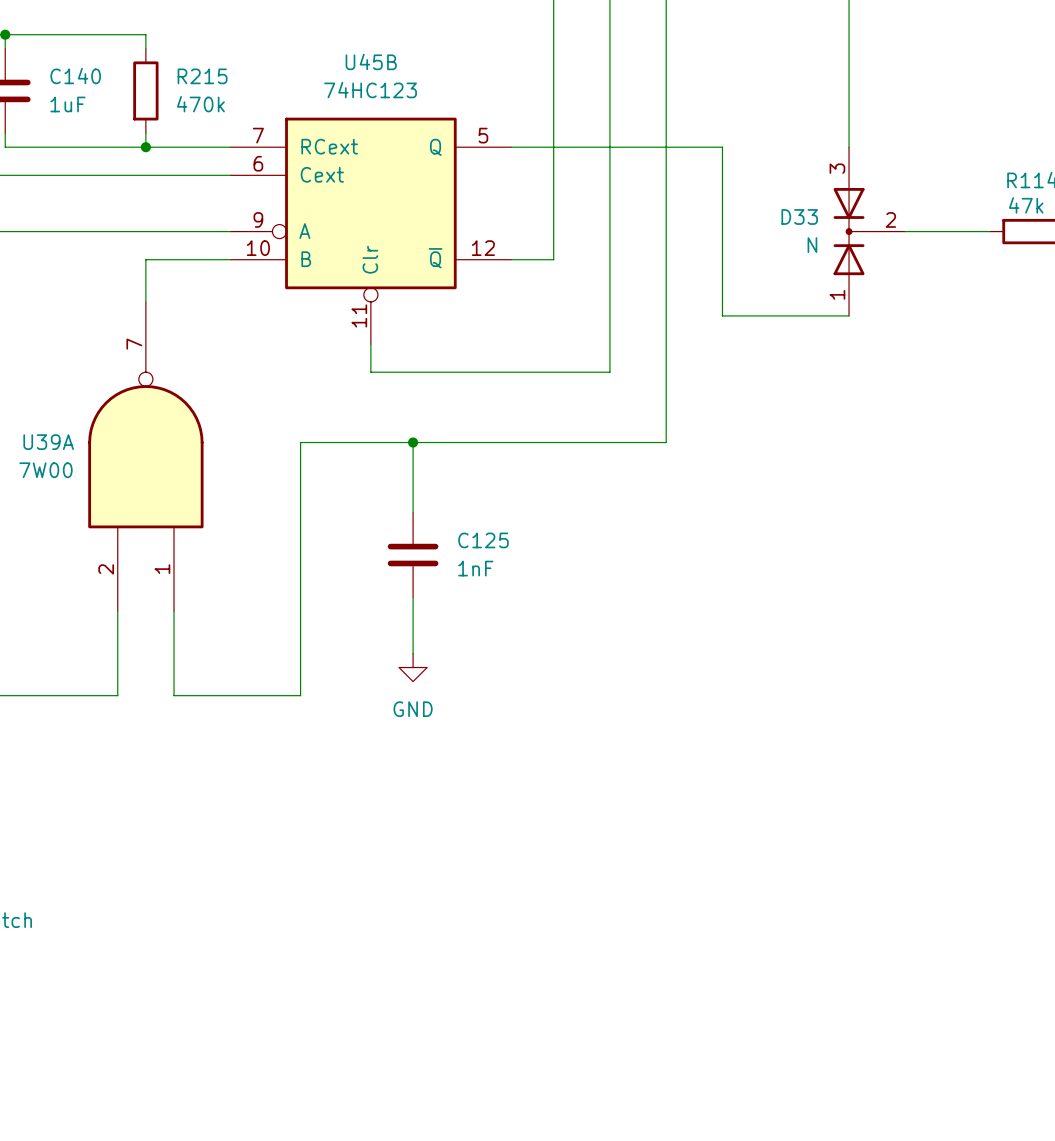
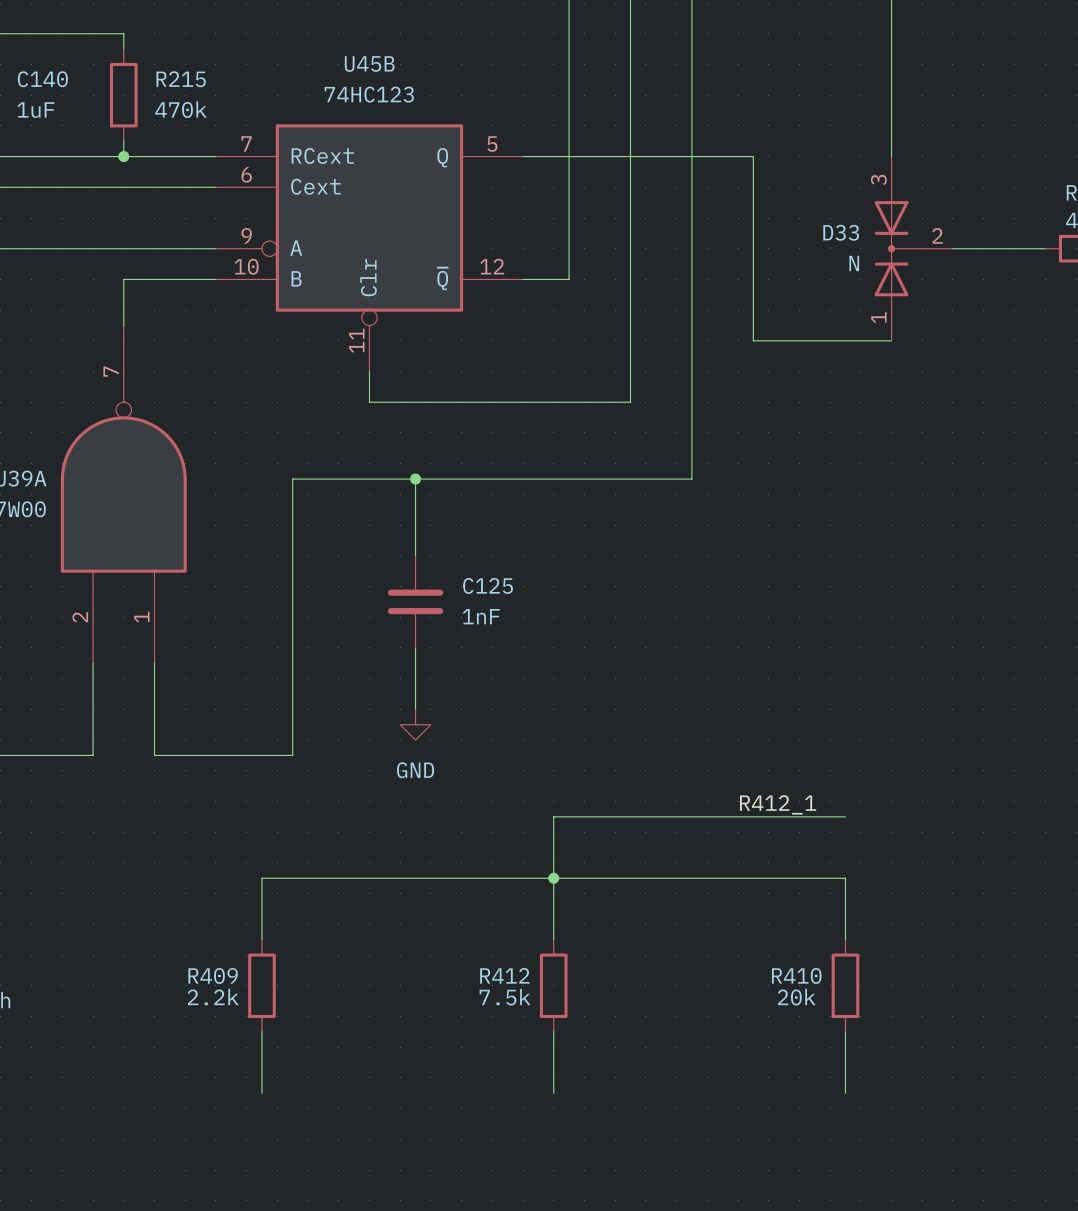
label: none -> R412_1 (778, 804)
wire: none -> (845, 816) (553, 816) (553, 939)
junction: none -> (553, 878)
wire: none -> (261, 939) (261, 878) (845, 878) (845, 939)
R409: none -> 2.2k (261, 985)
R412: none -> 7.5k (553, 985)
R410: none -> 20k (845, 985)
wire: none -> (261, 1031) (261, 1093)
wire: none -> (553, 1031) (553, 1093)
wire: none -> (845, 1031) (845, 1093)

